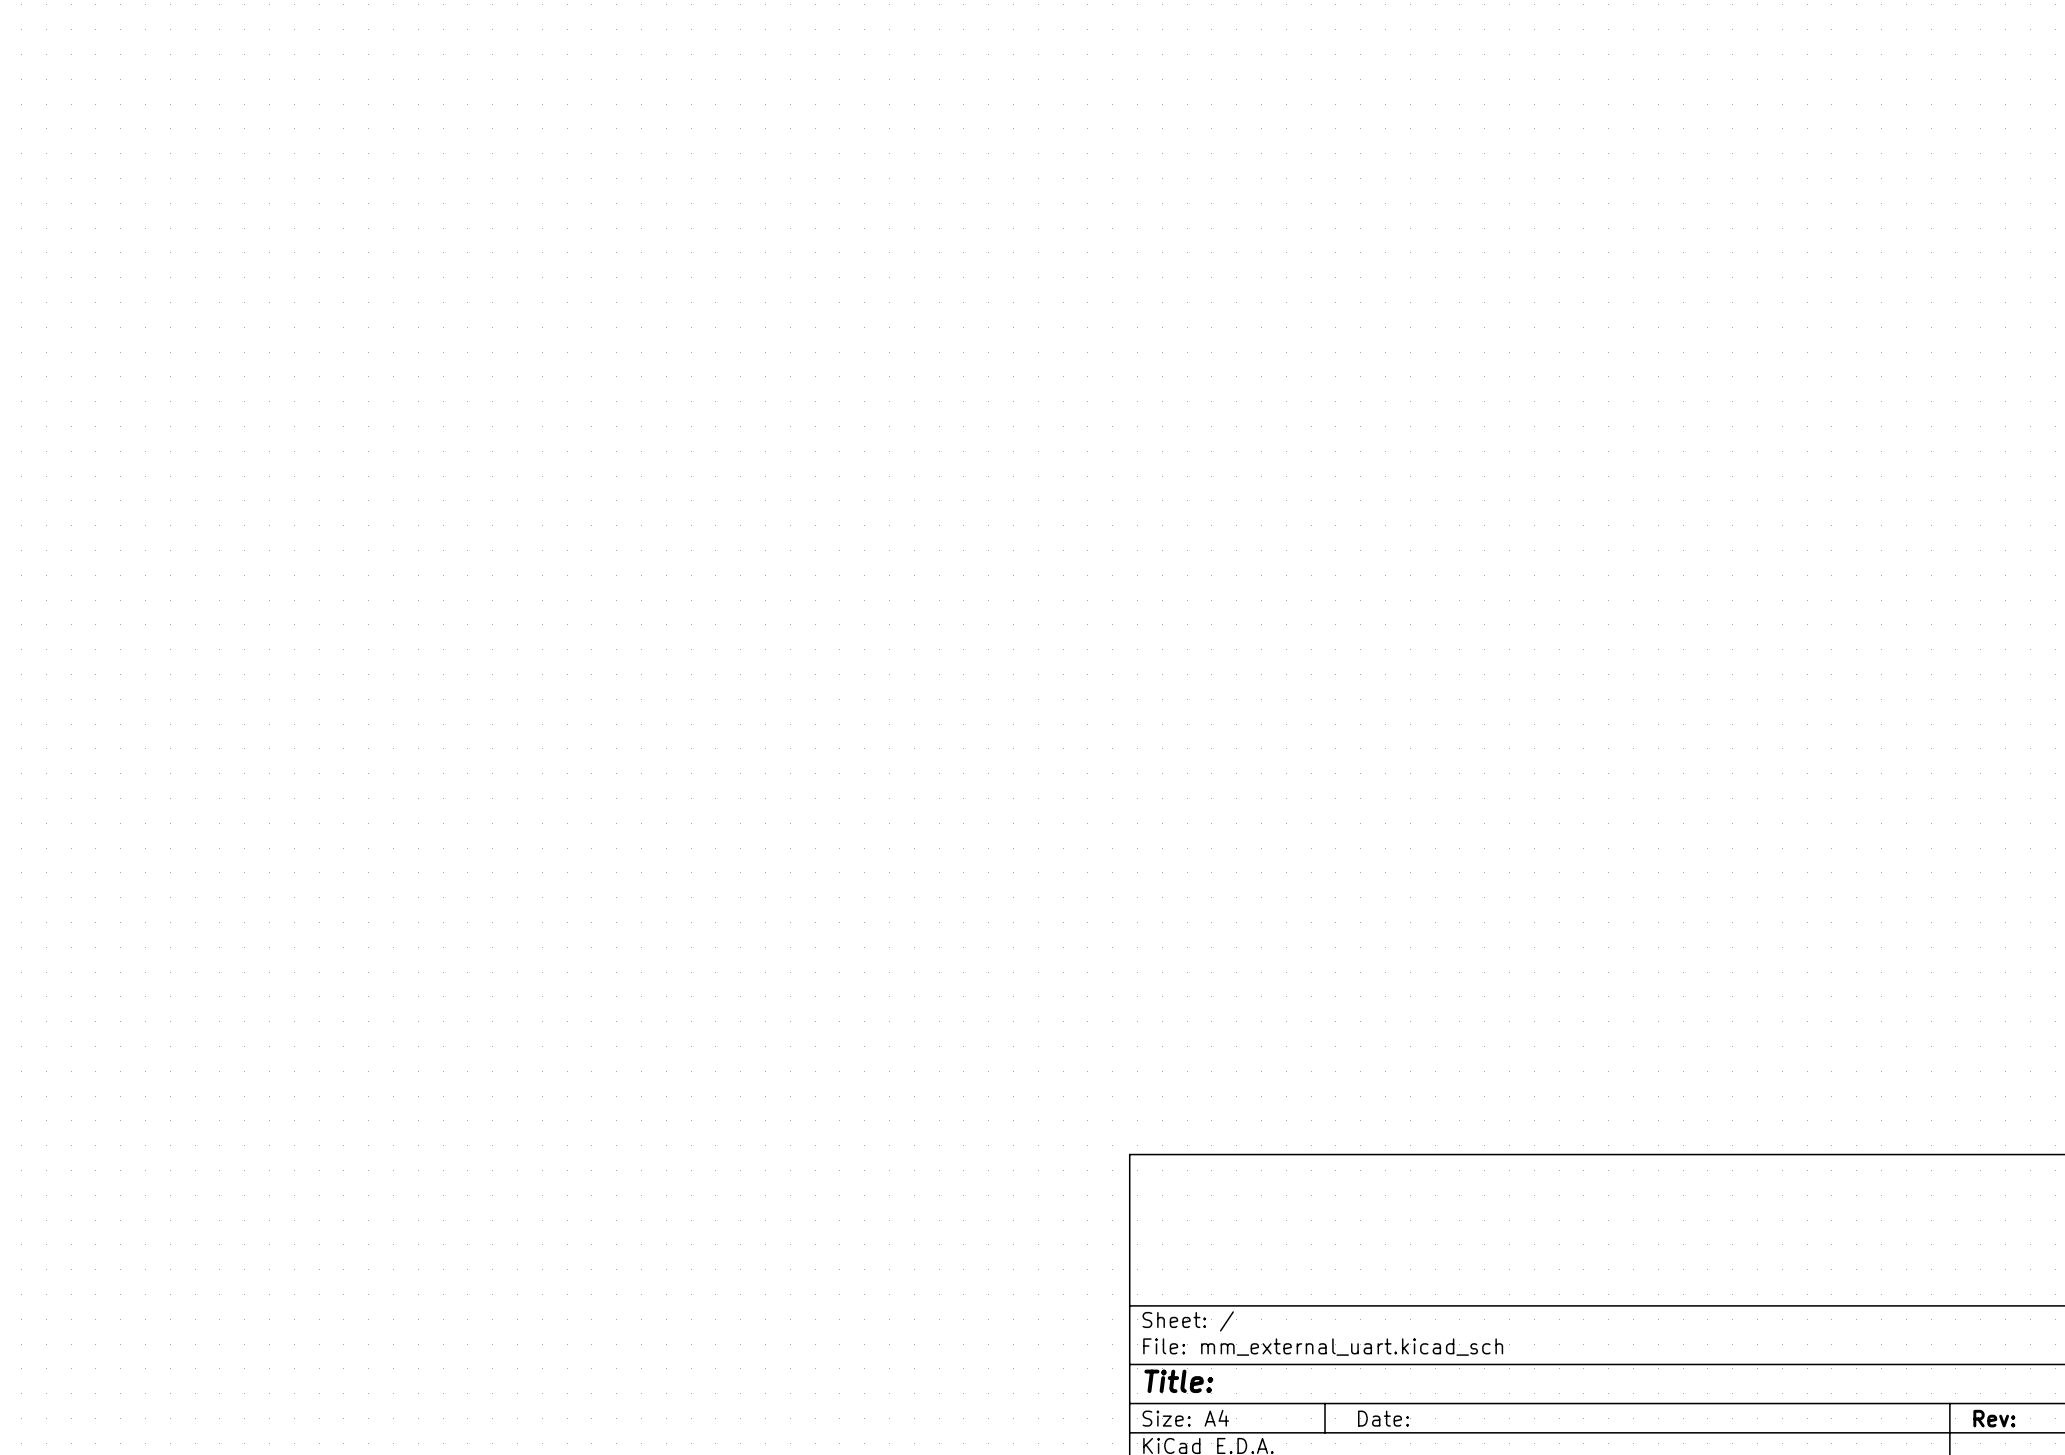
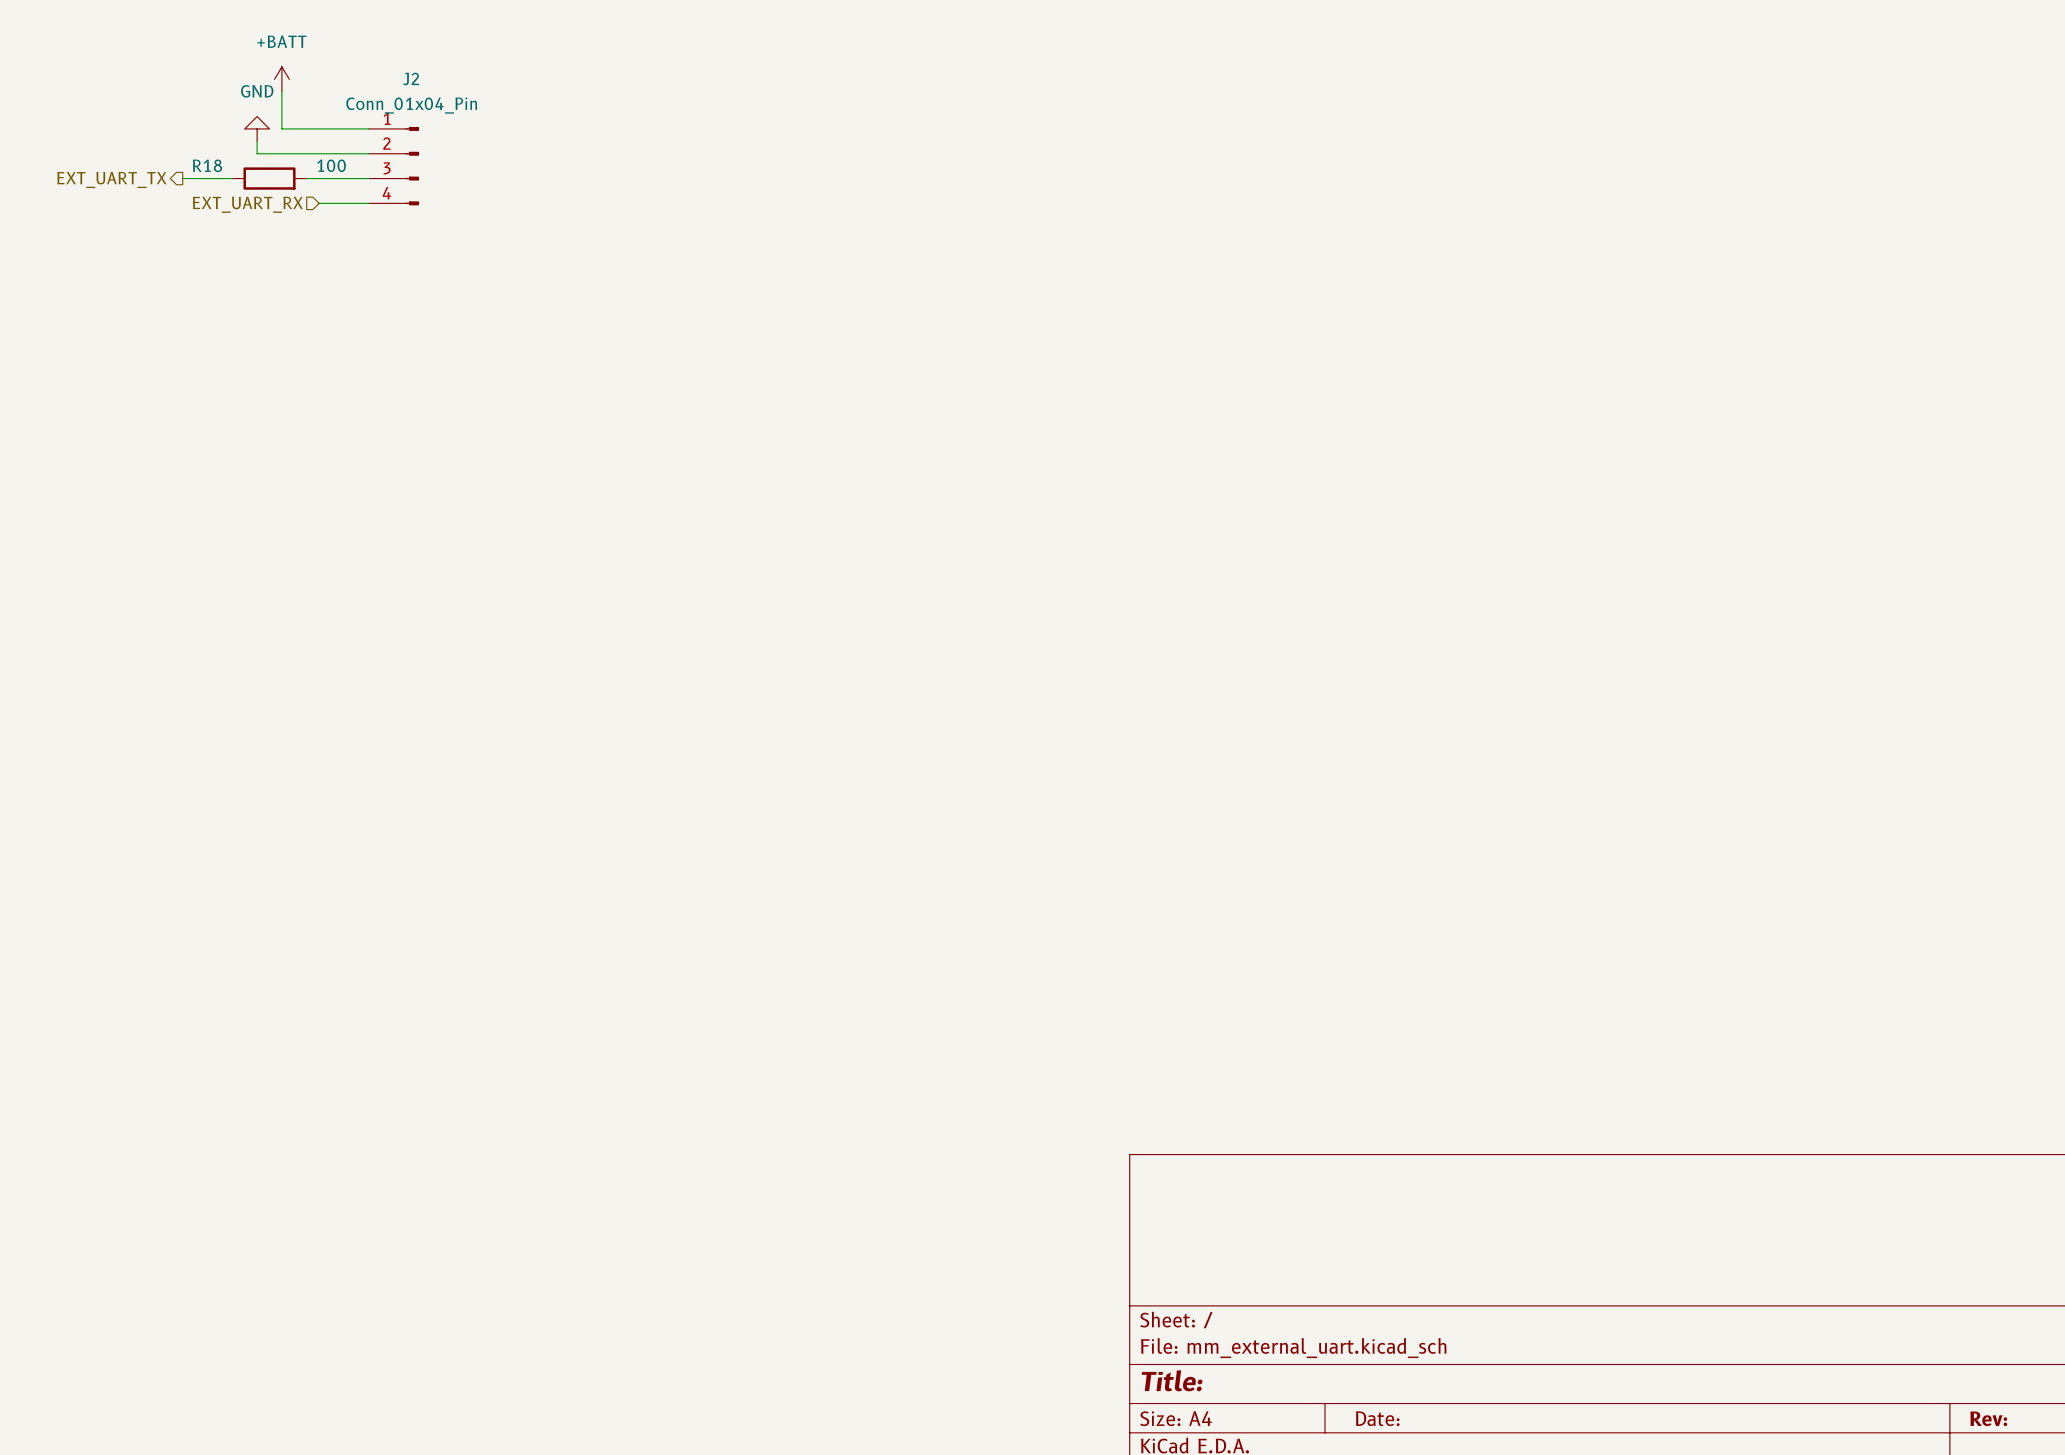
power symbol: none -> +BATT (281, 79)
wire: none -> (281, 91) (281, 128) (368, 128)
power symbol: none -> GND (257, 128)
wire: none -> (257, 141) (257, 153) (368, 153)
J2: none -> Conn_01x04_Pin (393, 166)
hierarchical label: none -> EXT_UART_TX (111, 179)
wire: none -> (182, 178) (232, 178)
R18: none -> 100 (269, 178)
wire: none -> (306, 178) (368, 178)
hierarchical label: none -> EXT_UART_RX (247, 204)
wire: none -> (319, 203) (368, 203)

